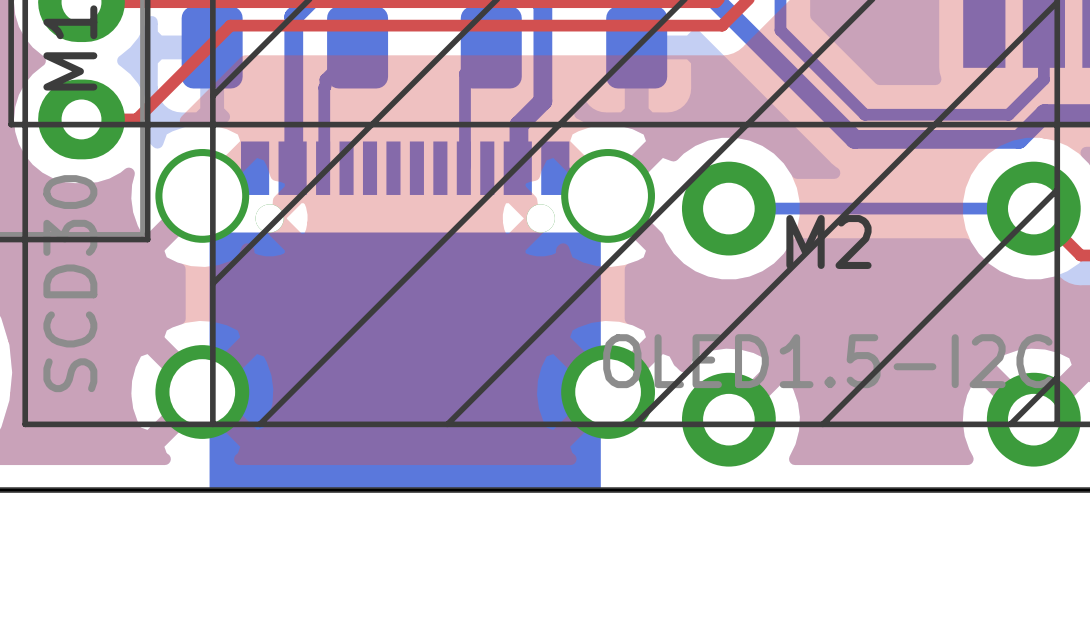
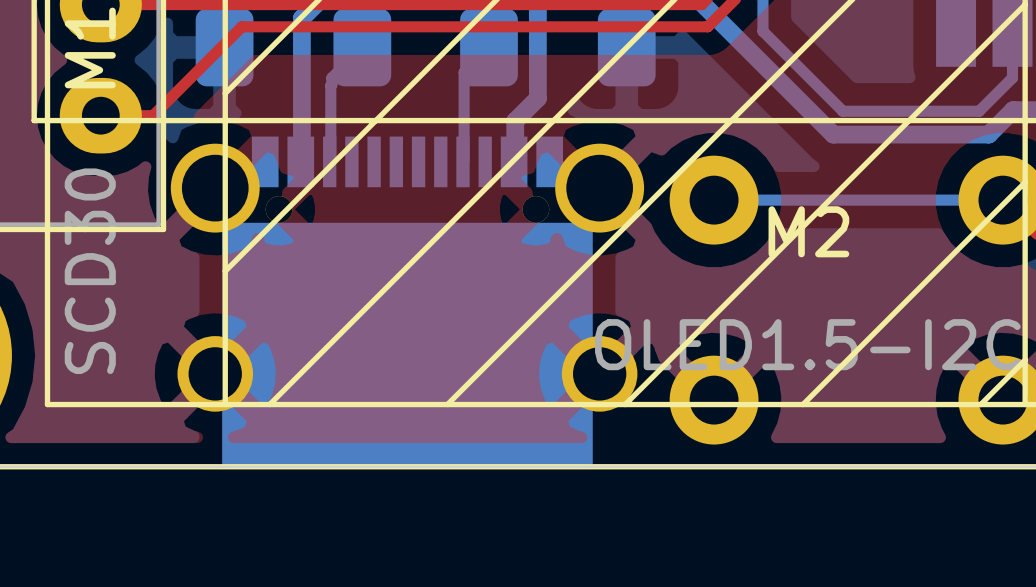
part footprint: [155, 141, 655, 491] -> [170, 136, 645, 467]

